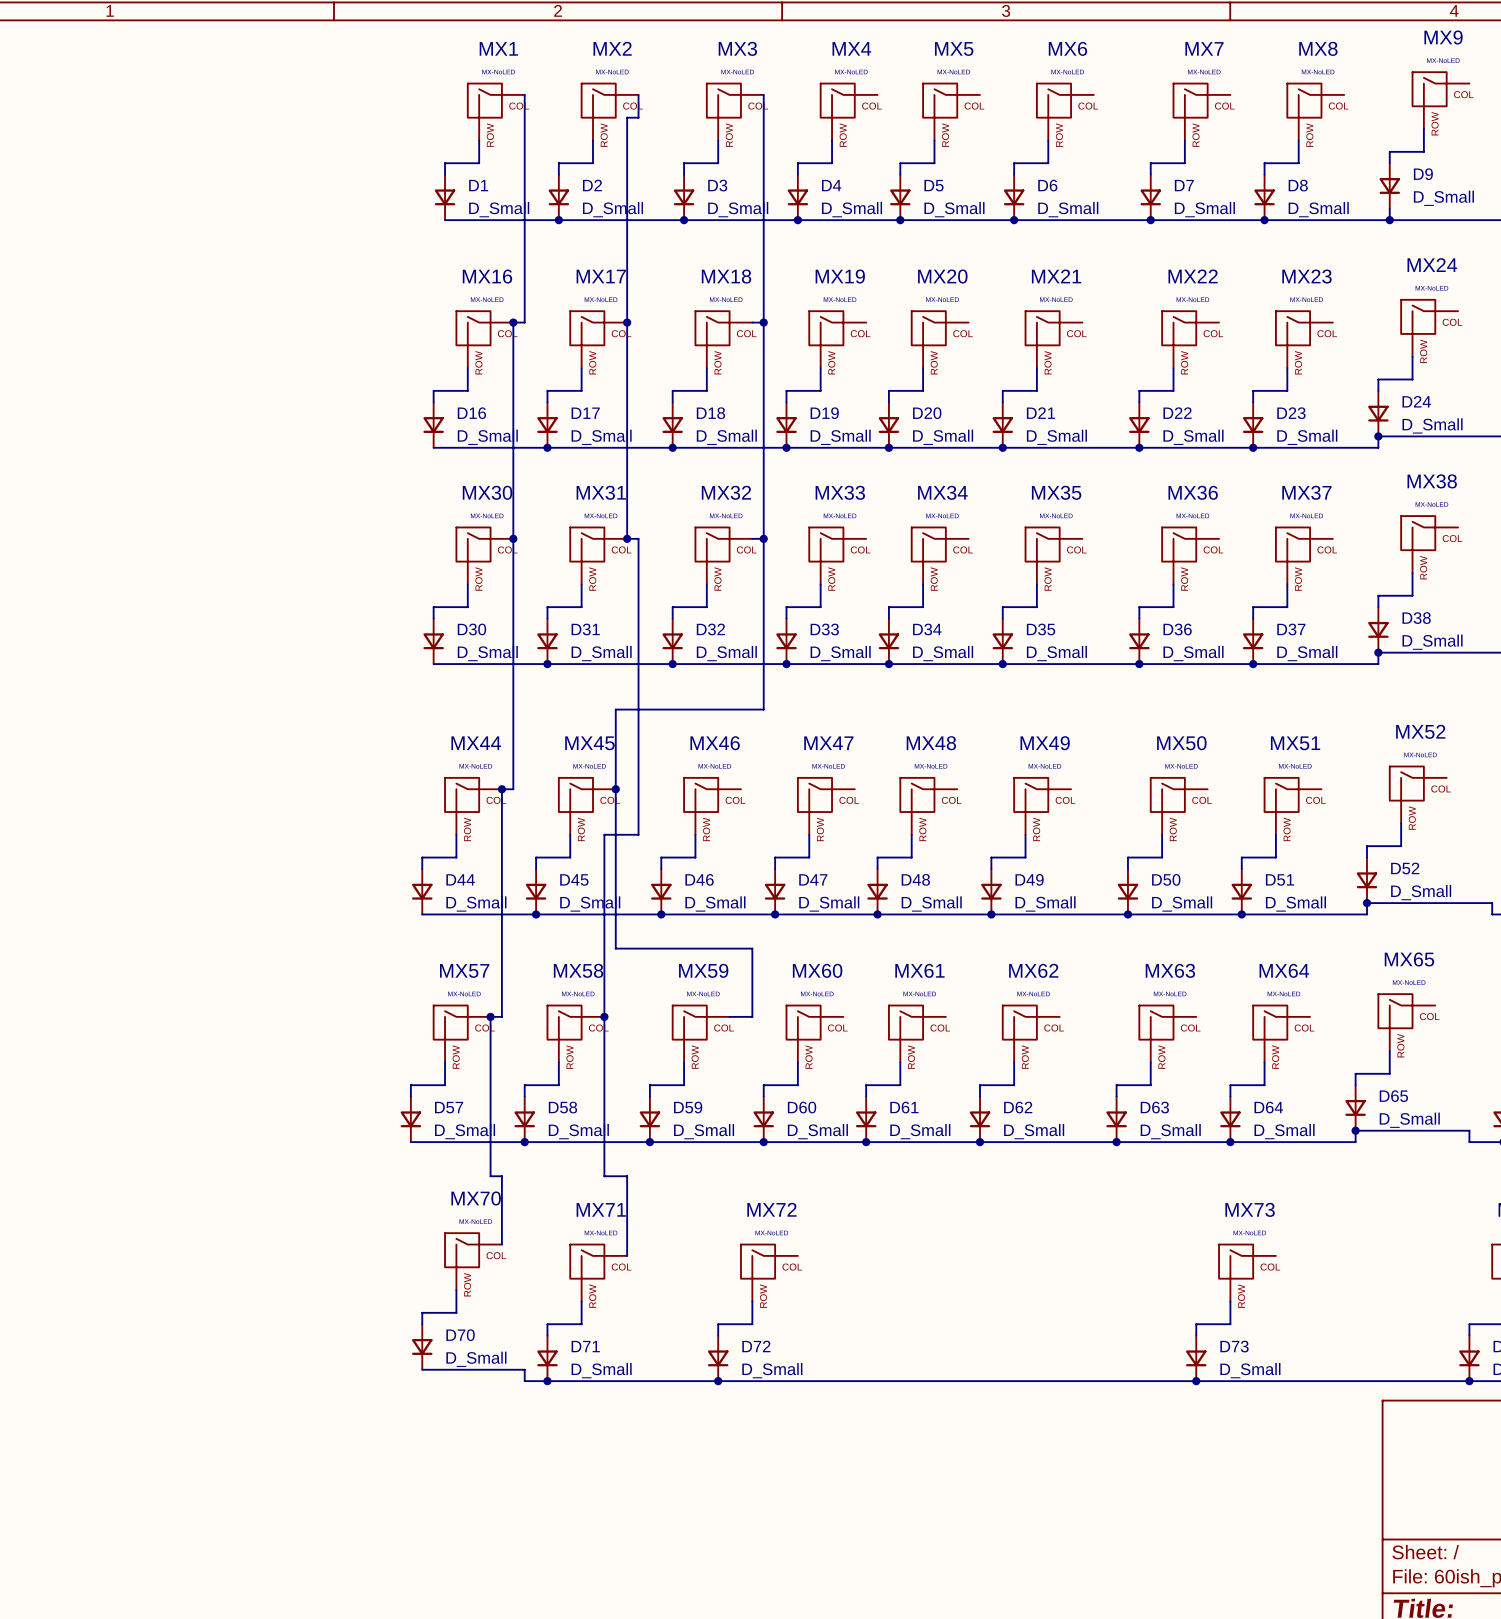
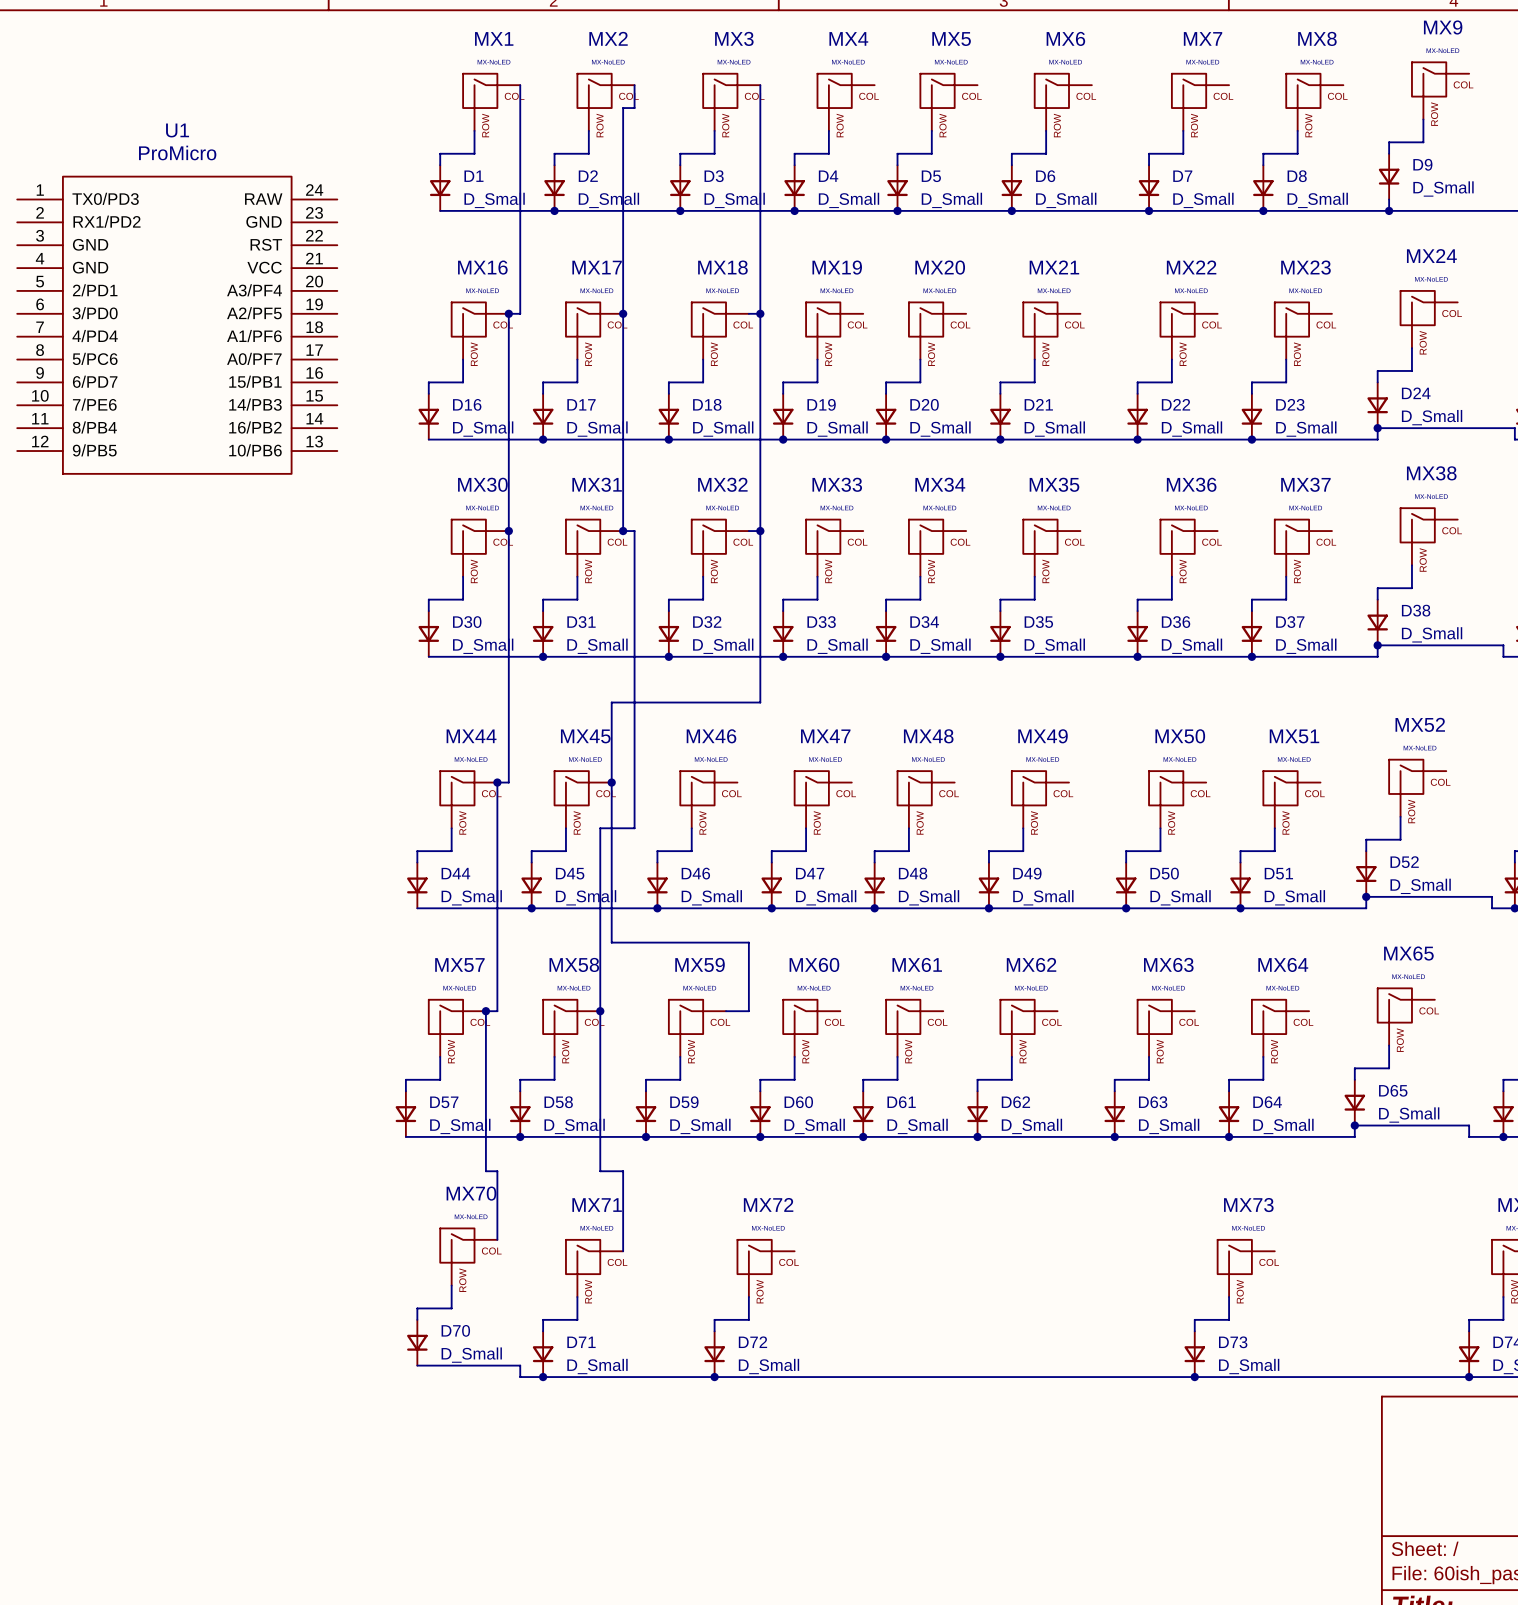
U1: none -> ProMicro (177, 325)

